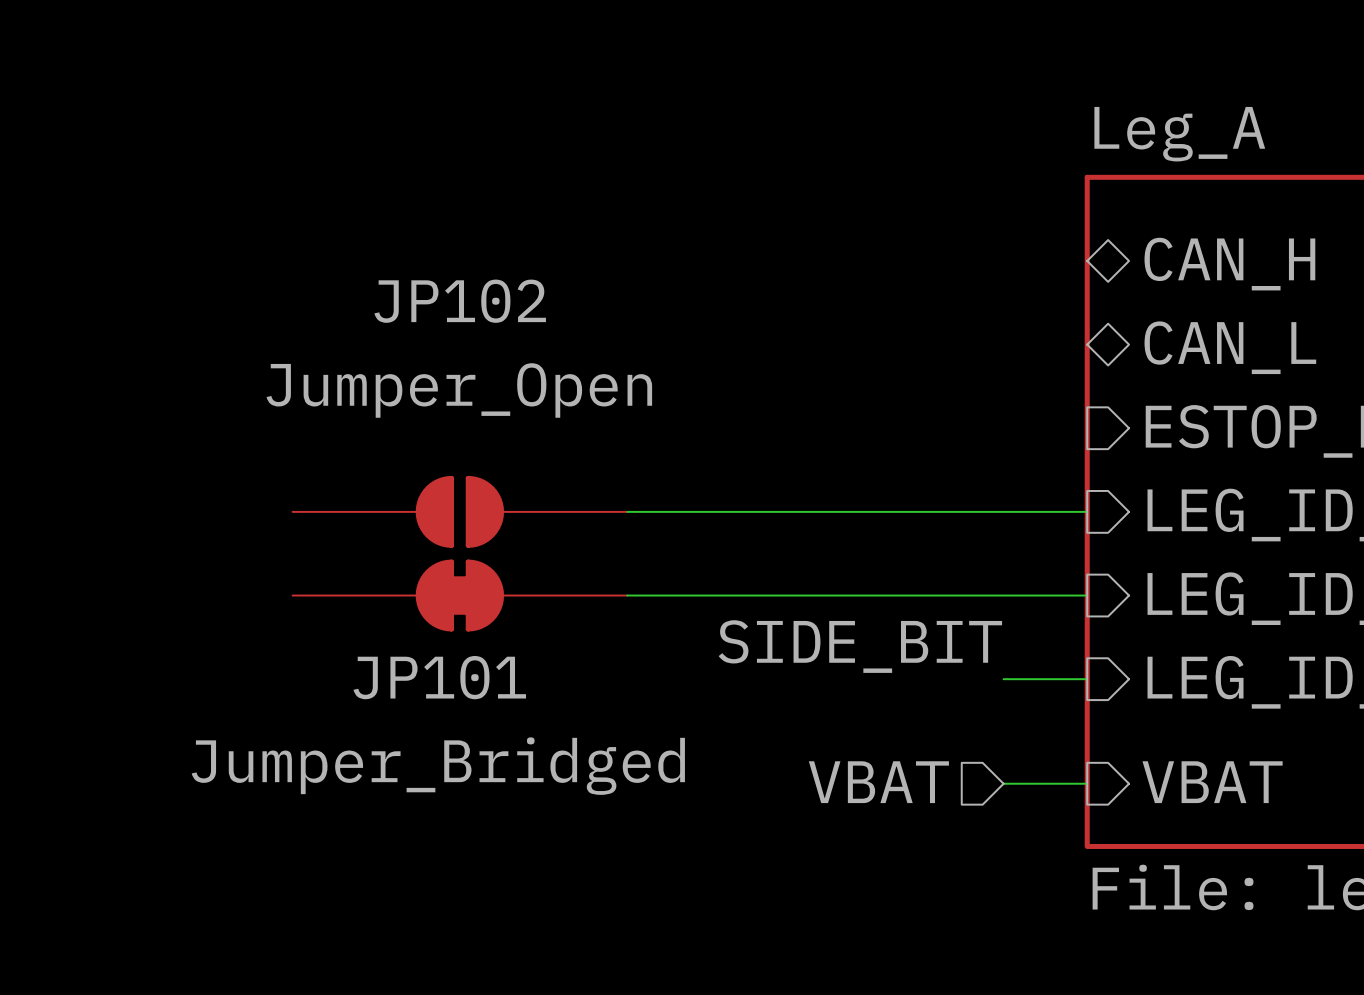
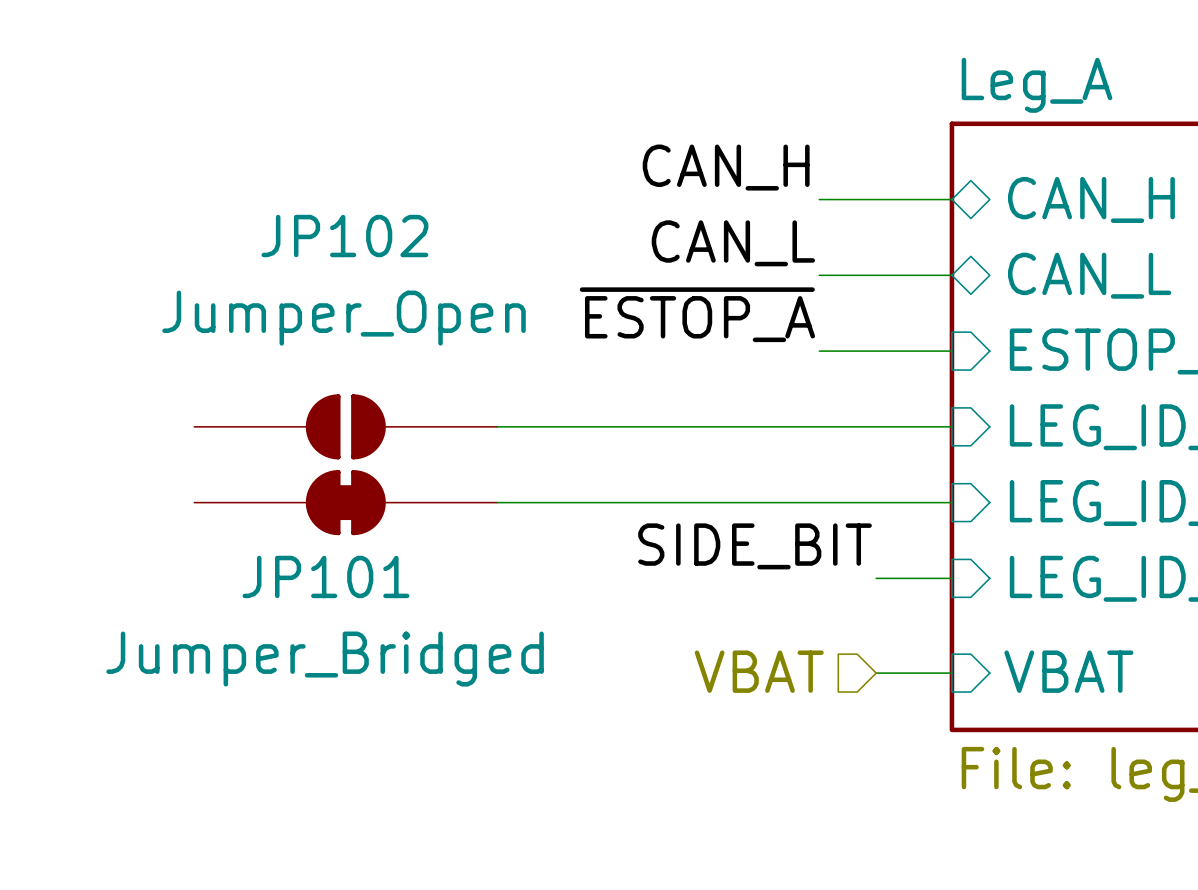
label: none -> CAN_H (726, 167)
wire: none -> (819, 199) (951, 199)
label: none -> CAN_L (733, 243)
wire: none -> (819, 275) (951, 275)
label: none -> ~{ESTOP_A} (697, 314)
wire: none -> (819, 351) (951, 351)
JP102 position: (459, 511) -> (345, 426)
JP101 position: (459, 595) -> (345, 502)

